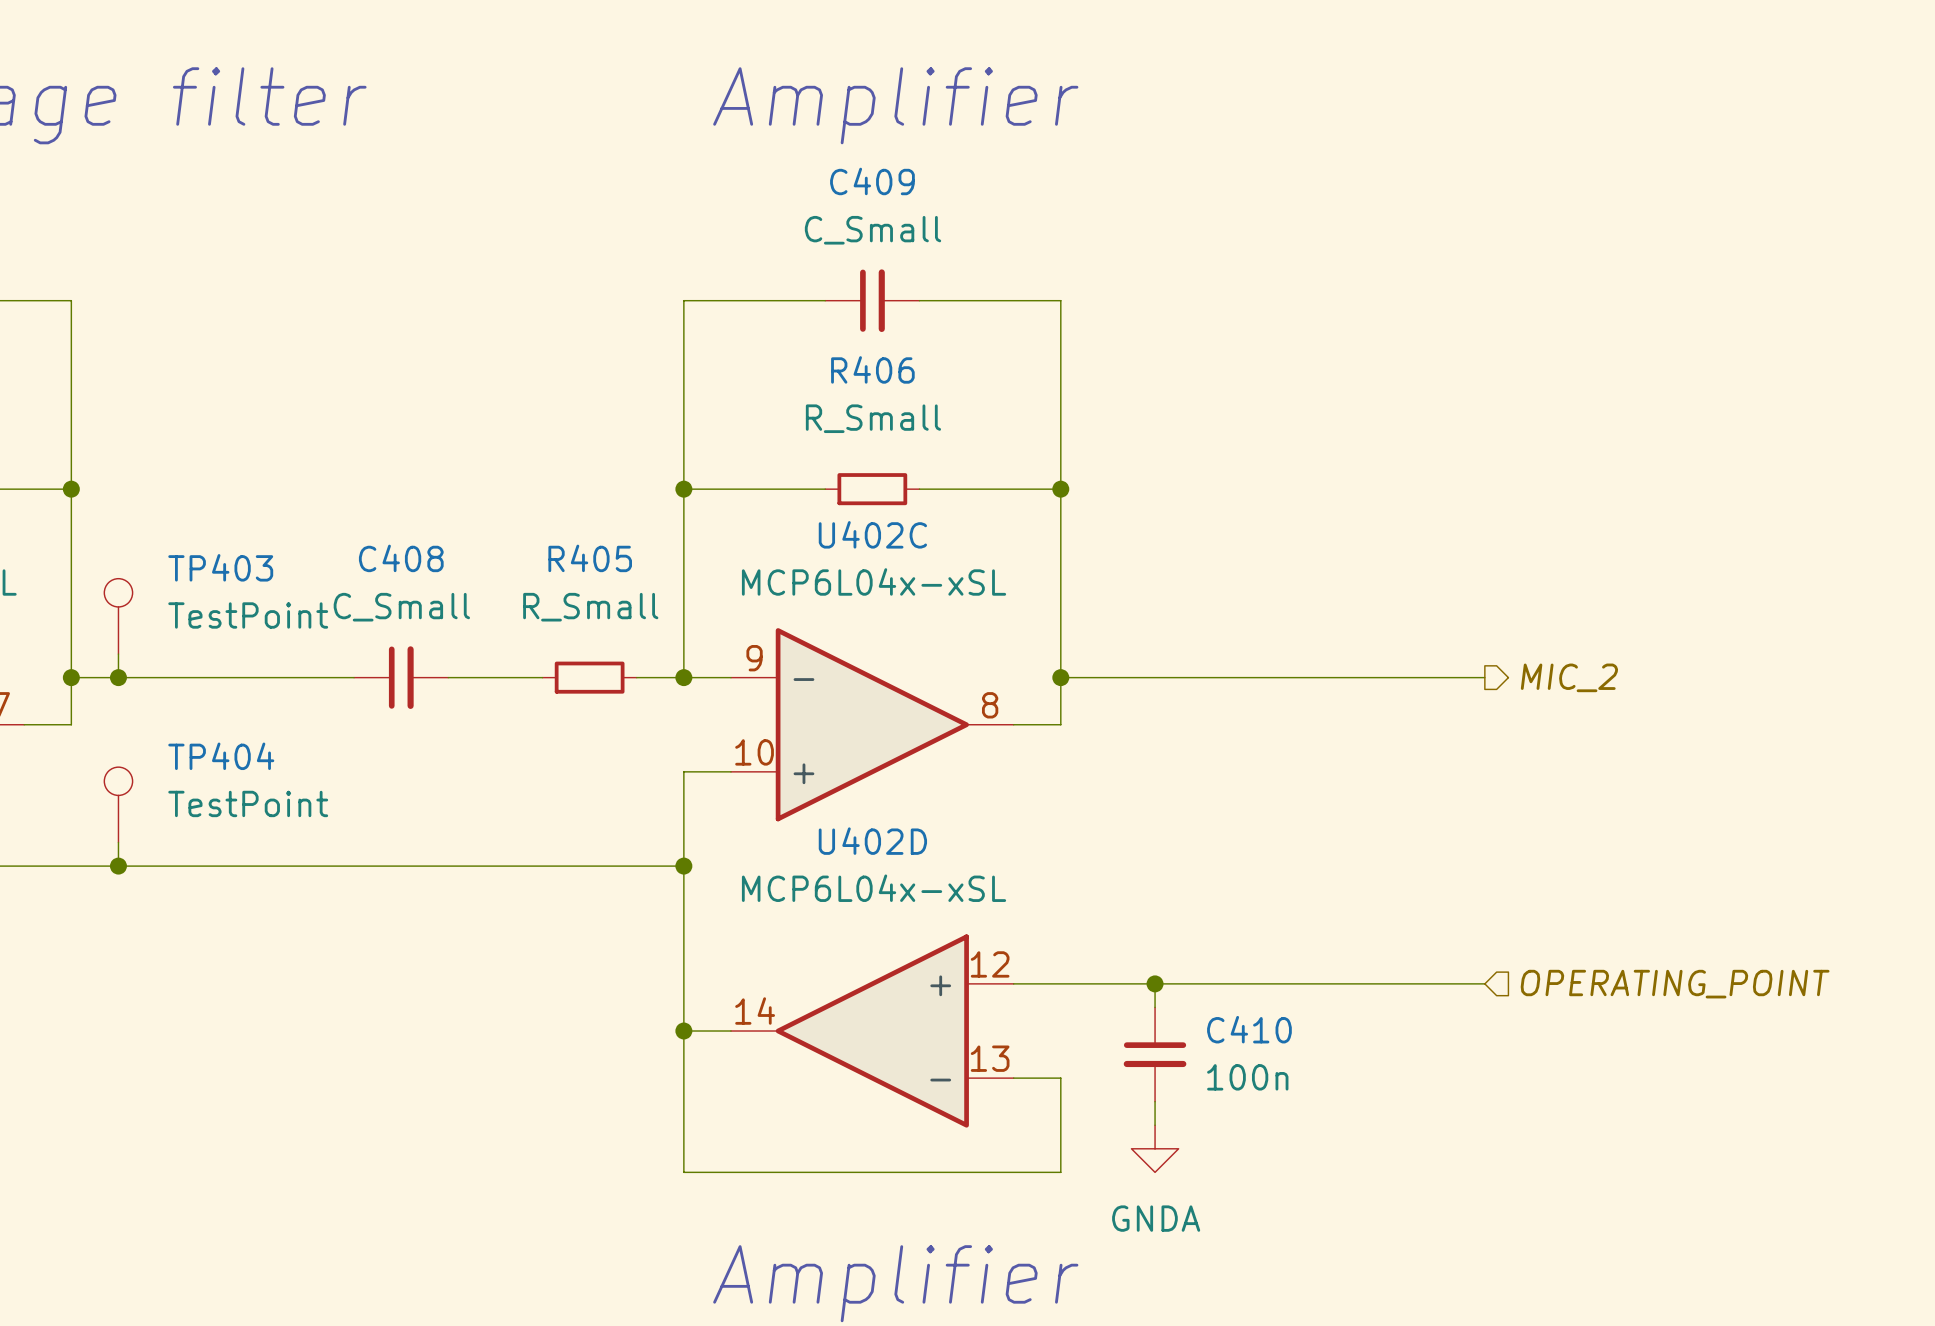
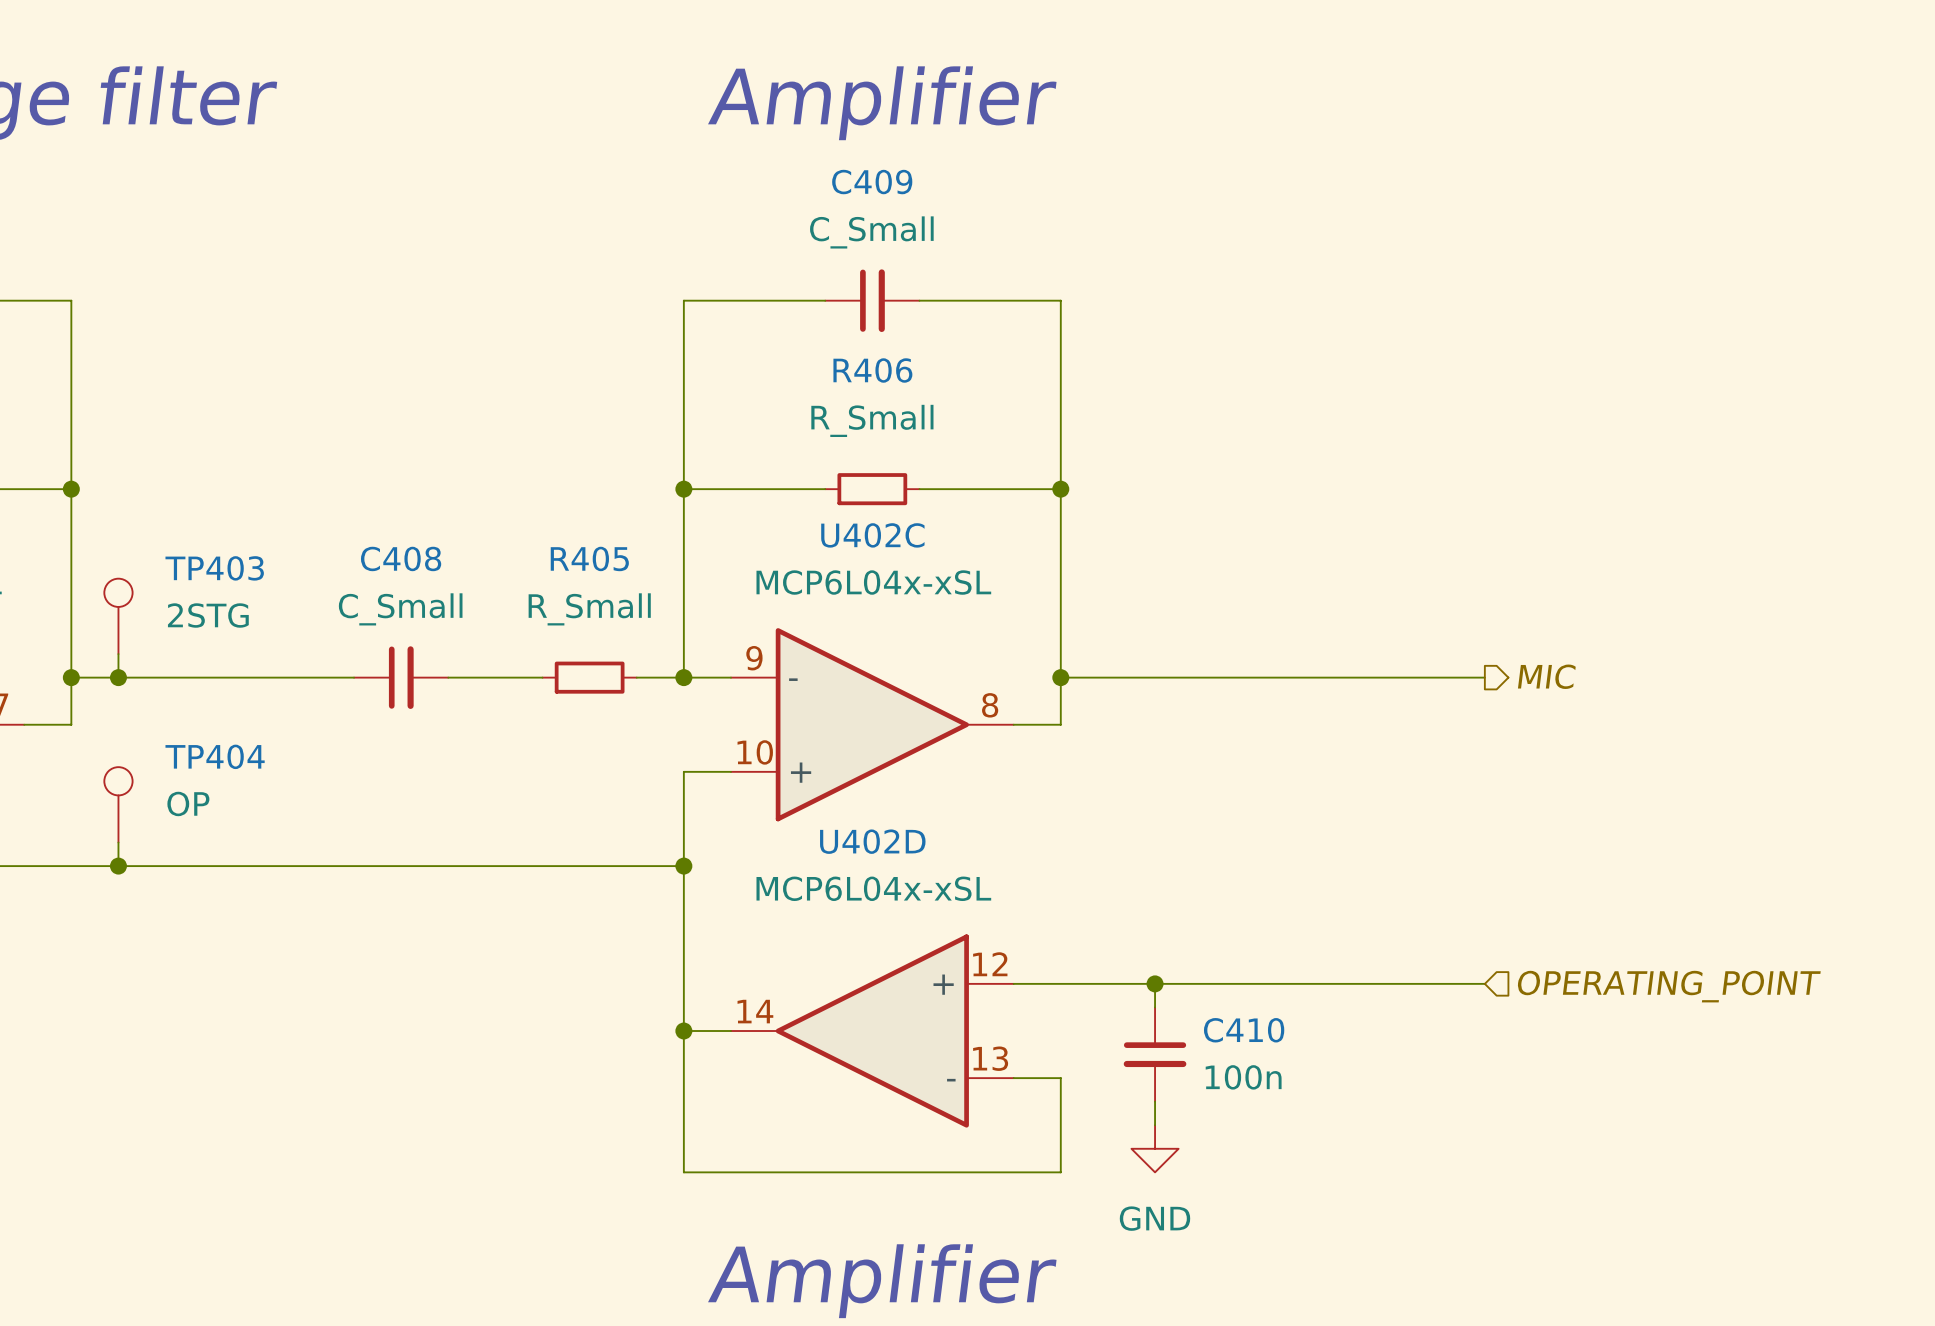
TP403 value: TestPoint (248, 615) -> 2STG (208, 615)
hierarchical label: MIC_2 (1569, 677) -> MIC (1546, 676)
TP404 value: TestPoint (248, 803) -> OP (188, 803)
power symbol: GNDA (1155, 1148) -> GND (1155, 1148)

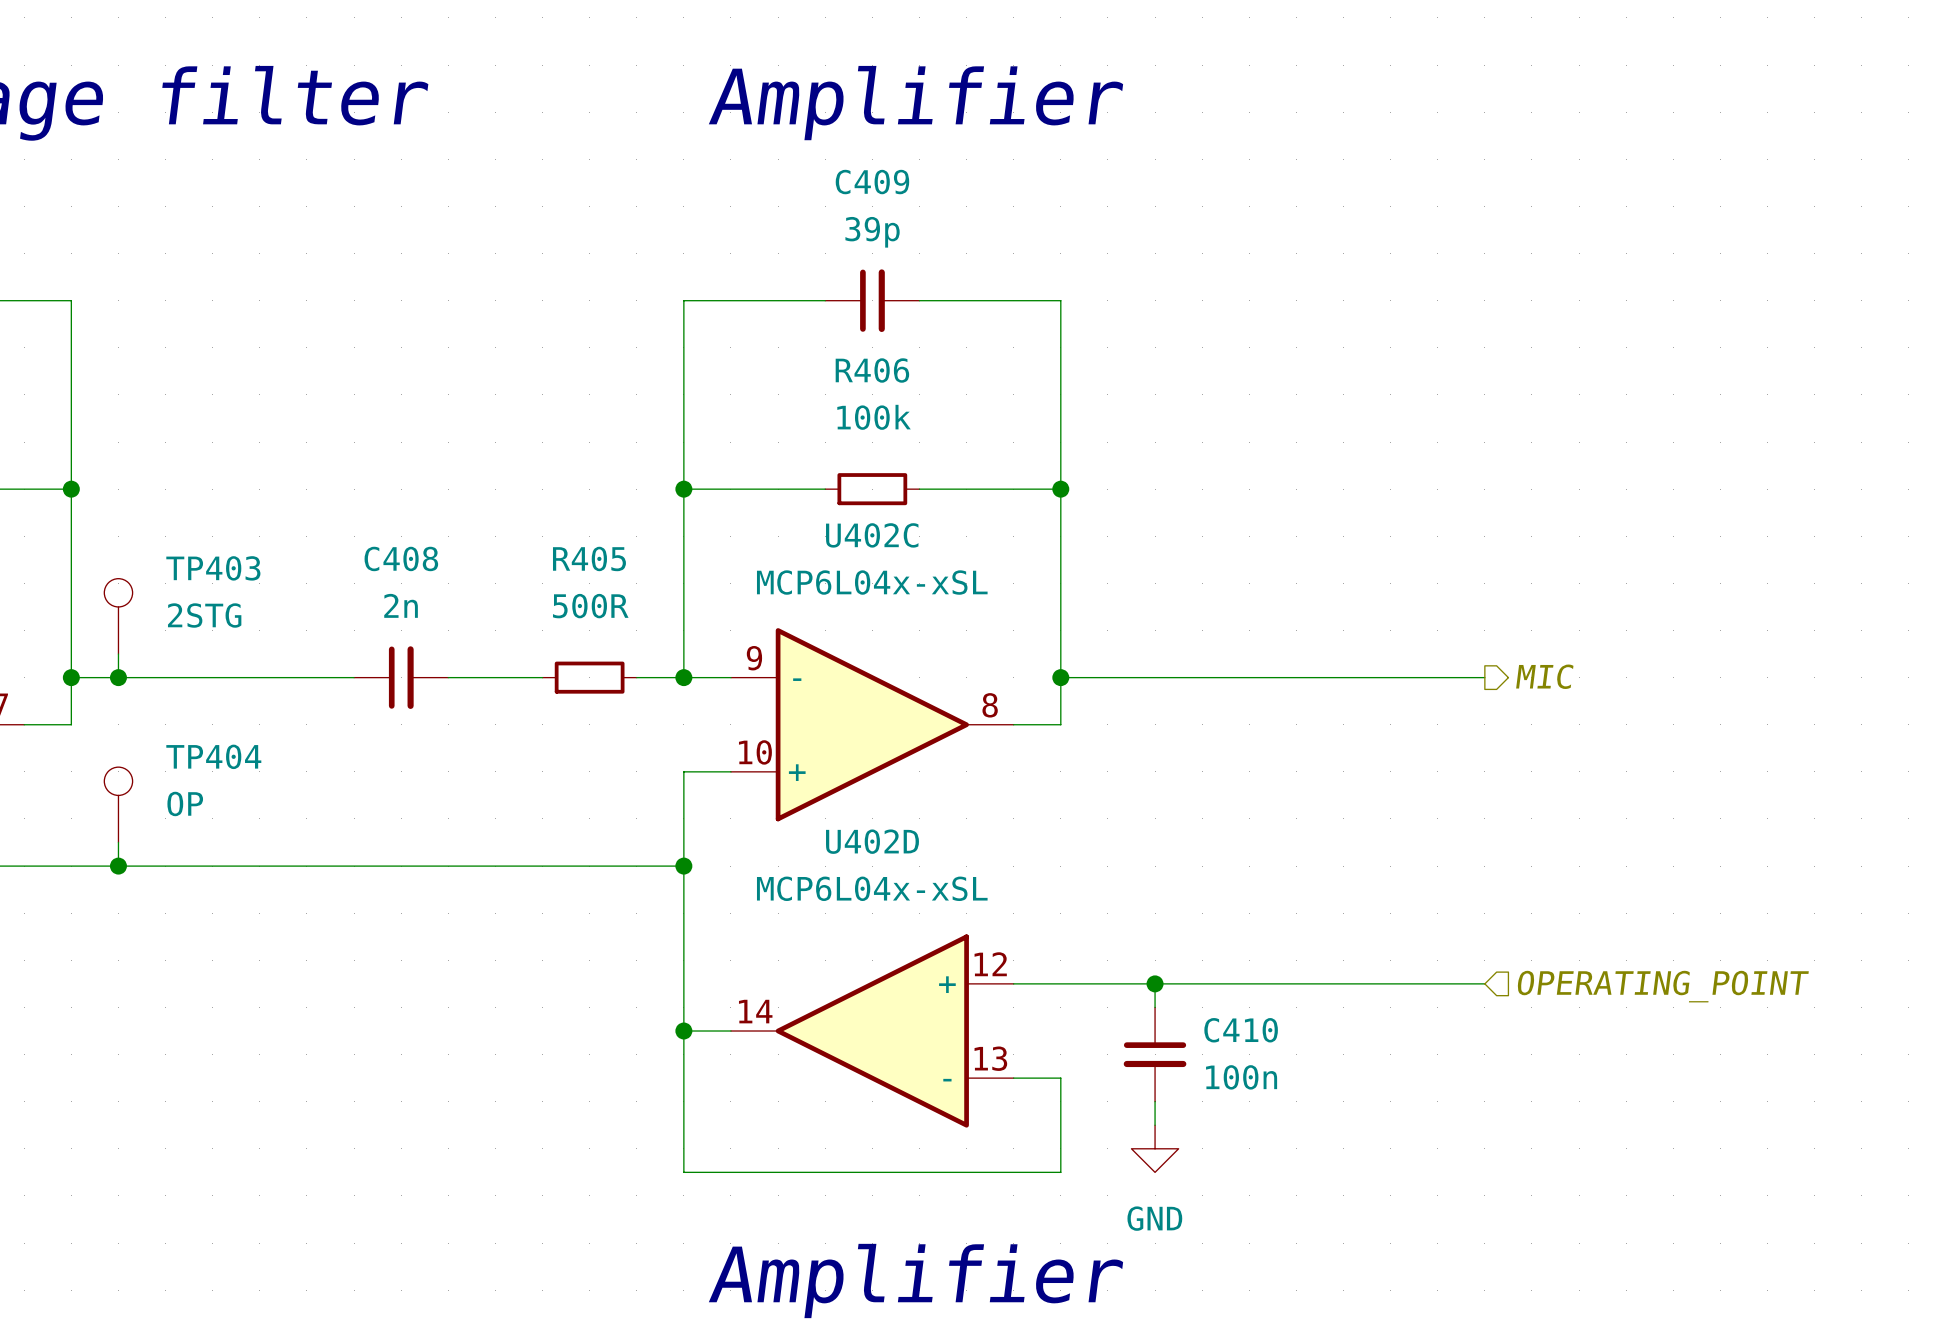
C409 value: C_Small (871, 232) -> 39p (872, 232)
R406 value: R_Small (872, 420) -> 100k (874, 417)
C408 value: C_Small (400, 609) -> 2n (401, 605)
R405 value: R_Small (589, 609) -> 500R (590, 606)

